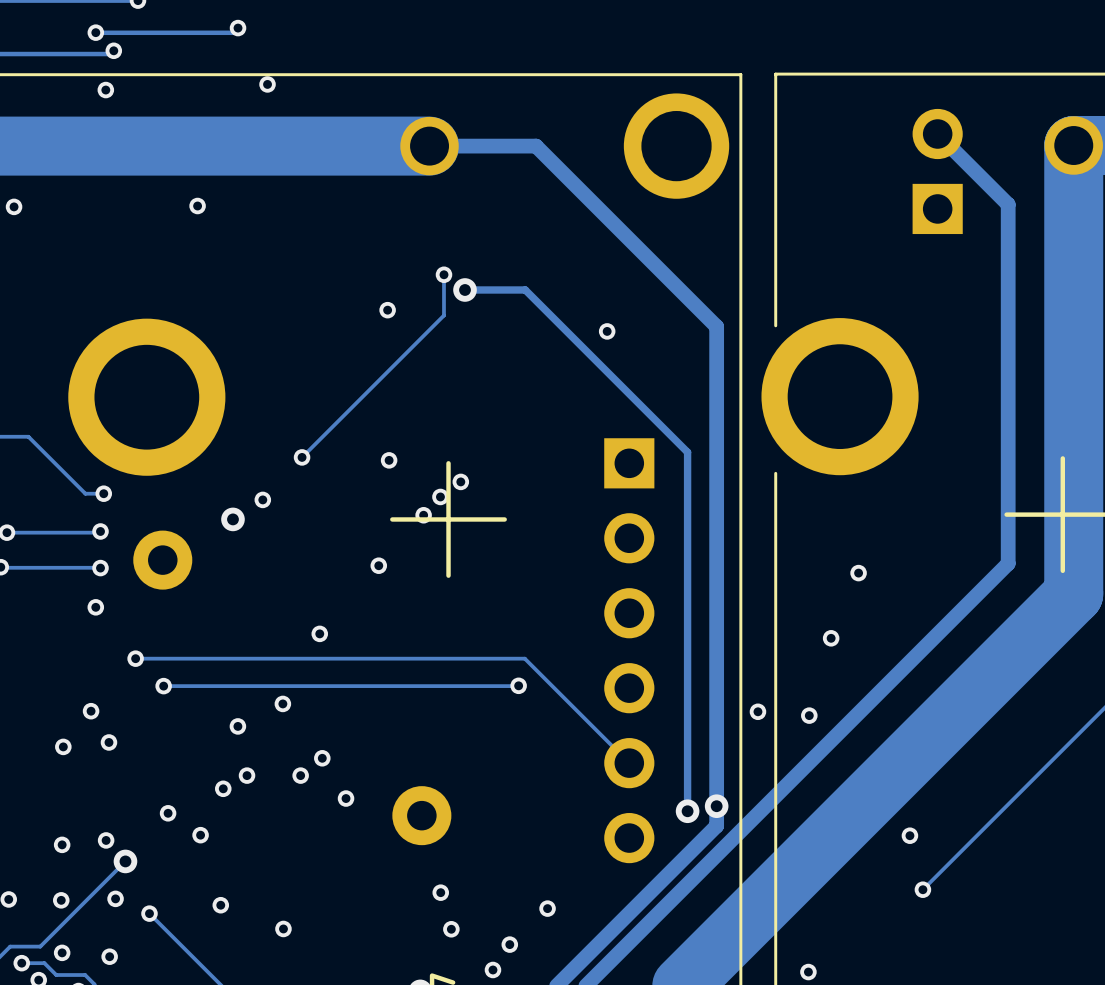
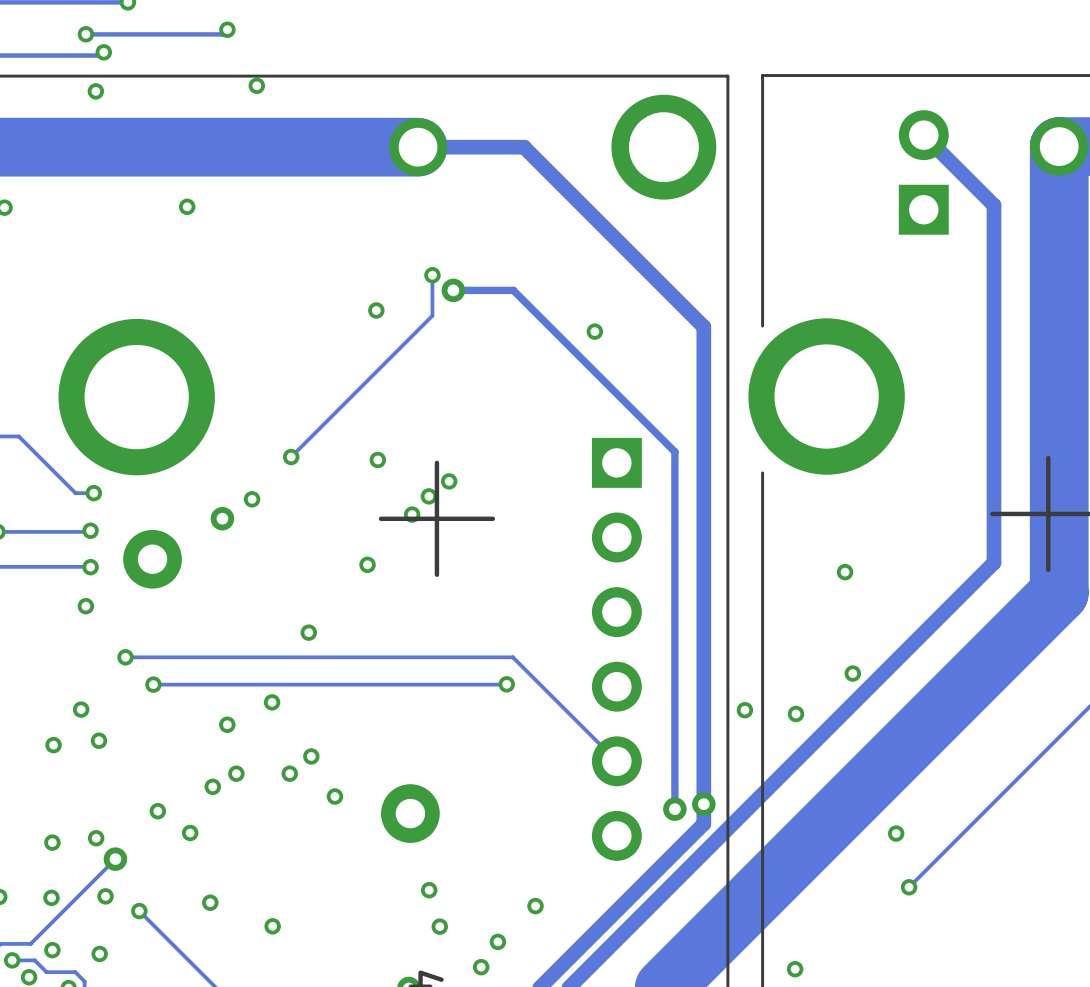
via position: (831, 638) -> (852, 673)

